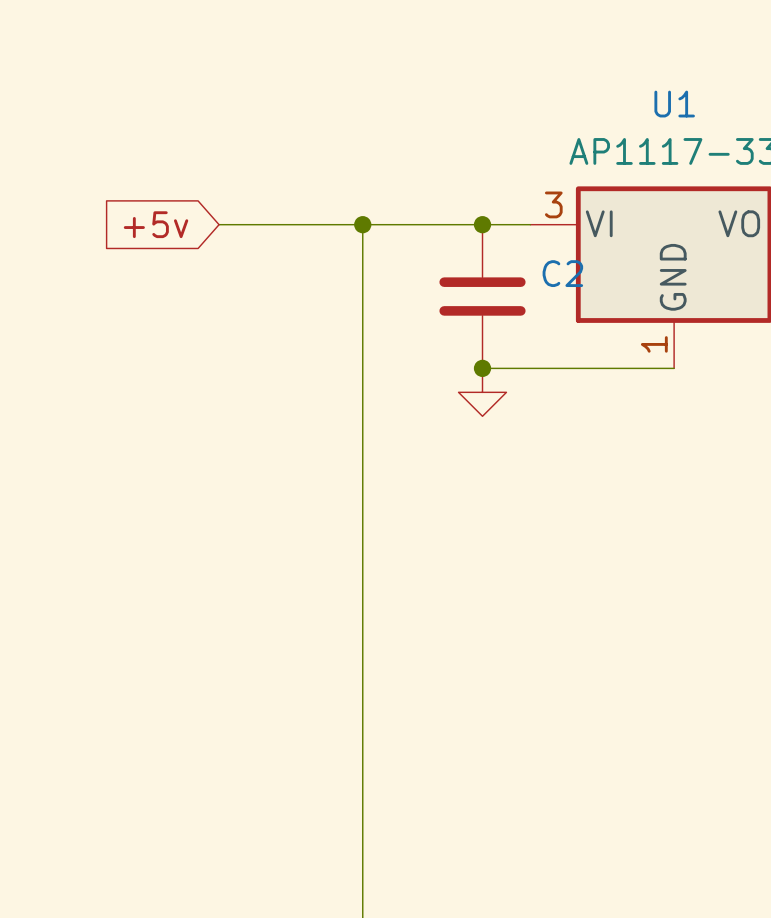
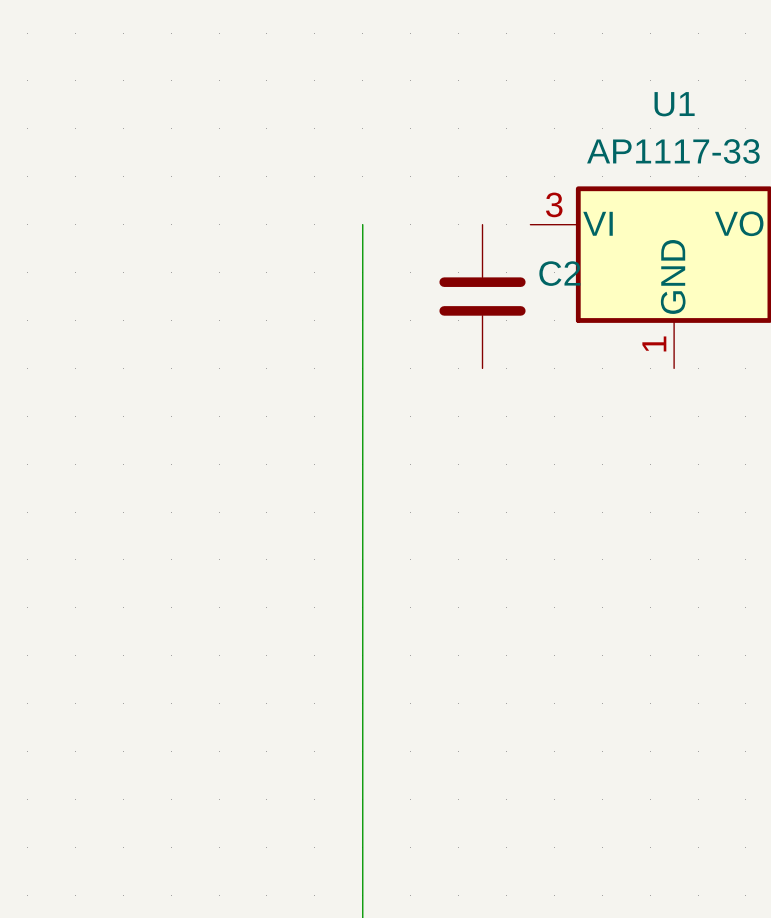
global label: +5v (156, 224) -> none
wire: (219, 224) (530, 224) -> none
junction: (362, 224) -> none
junction: (482, 224) -> none
wire: (482, 368) (674, 368) -> none
junction: (482, 368) -> none
power symbol: (482, 392) -> none

